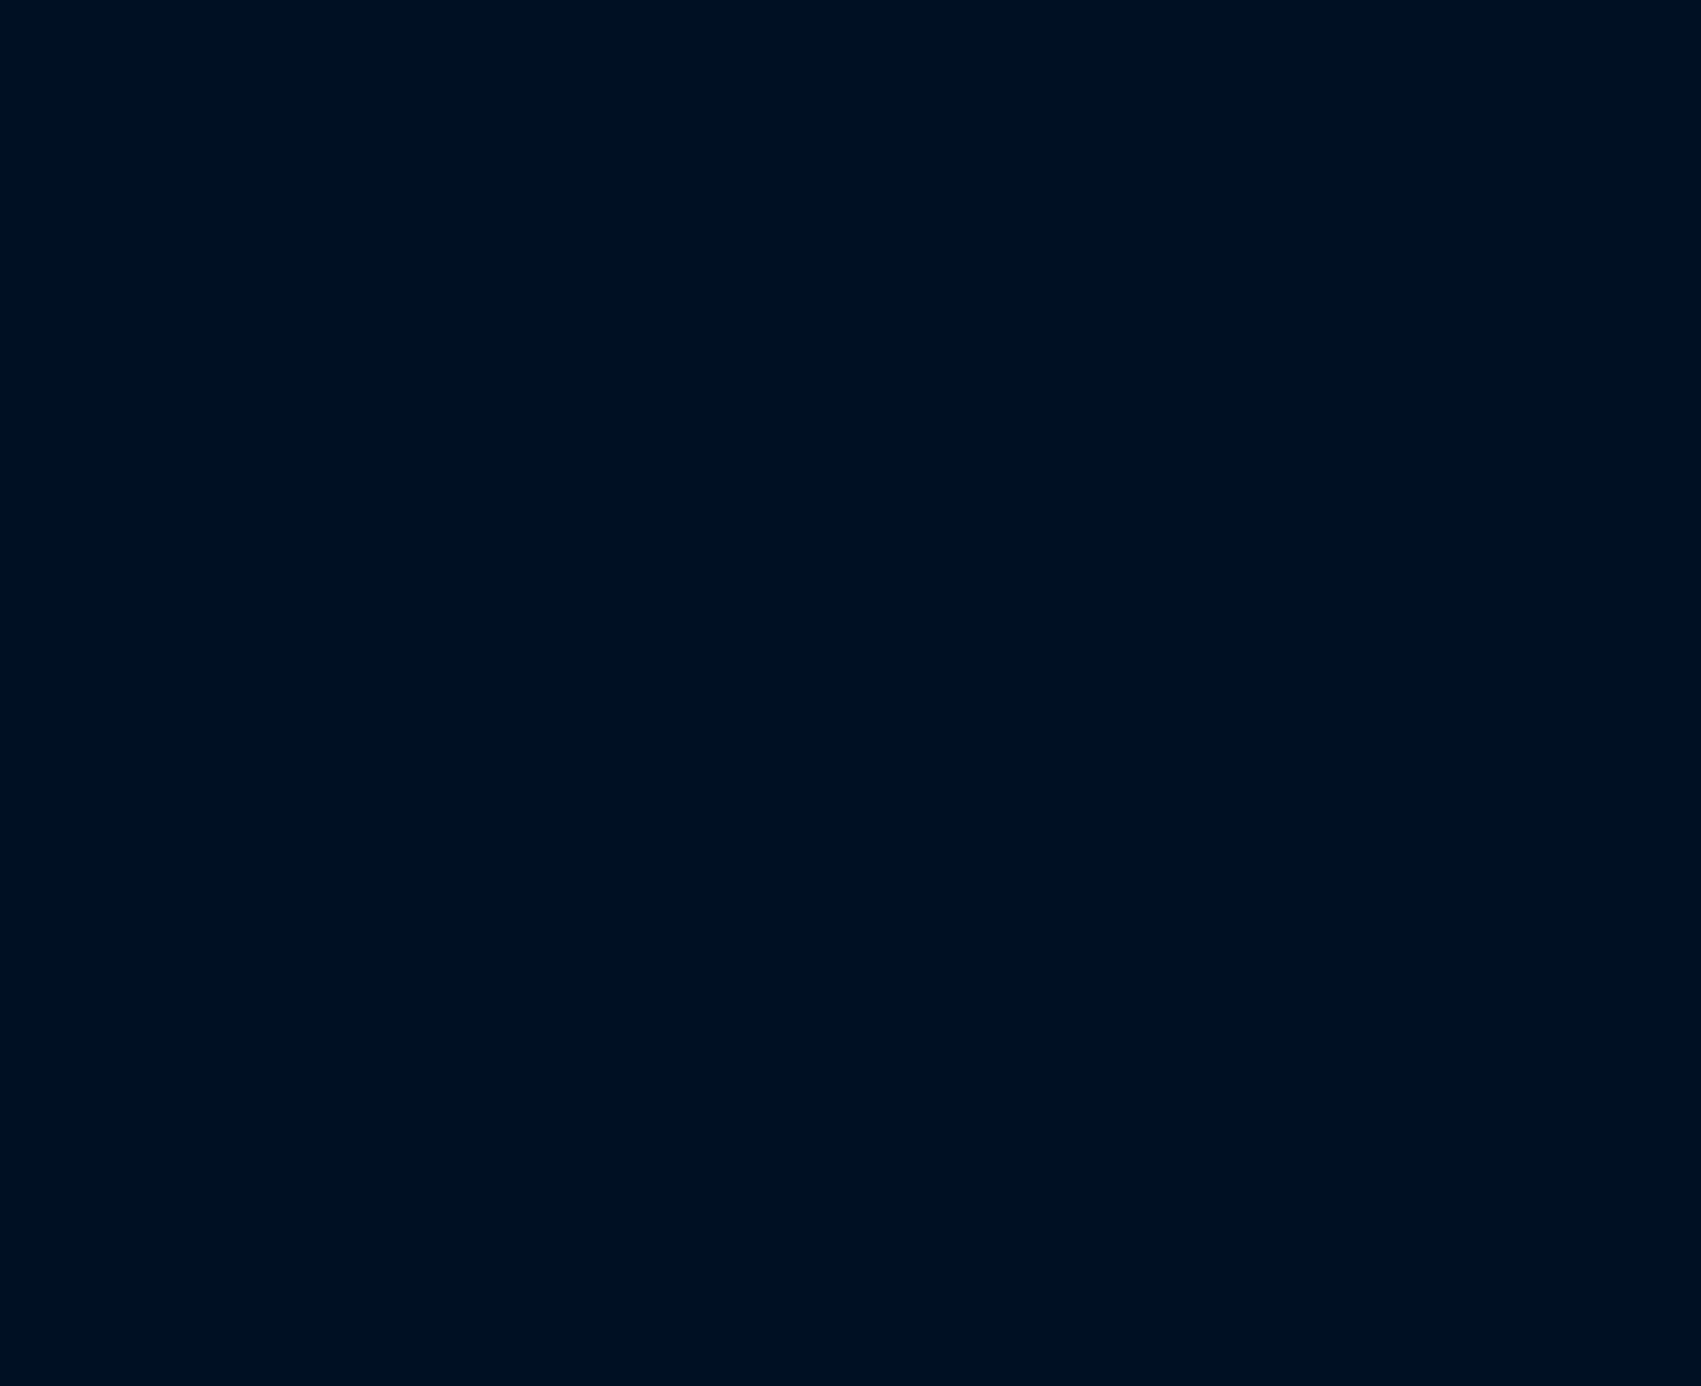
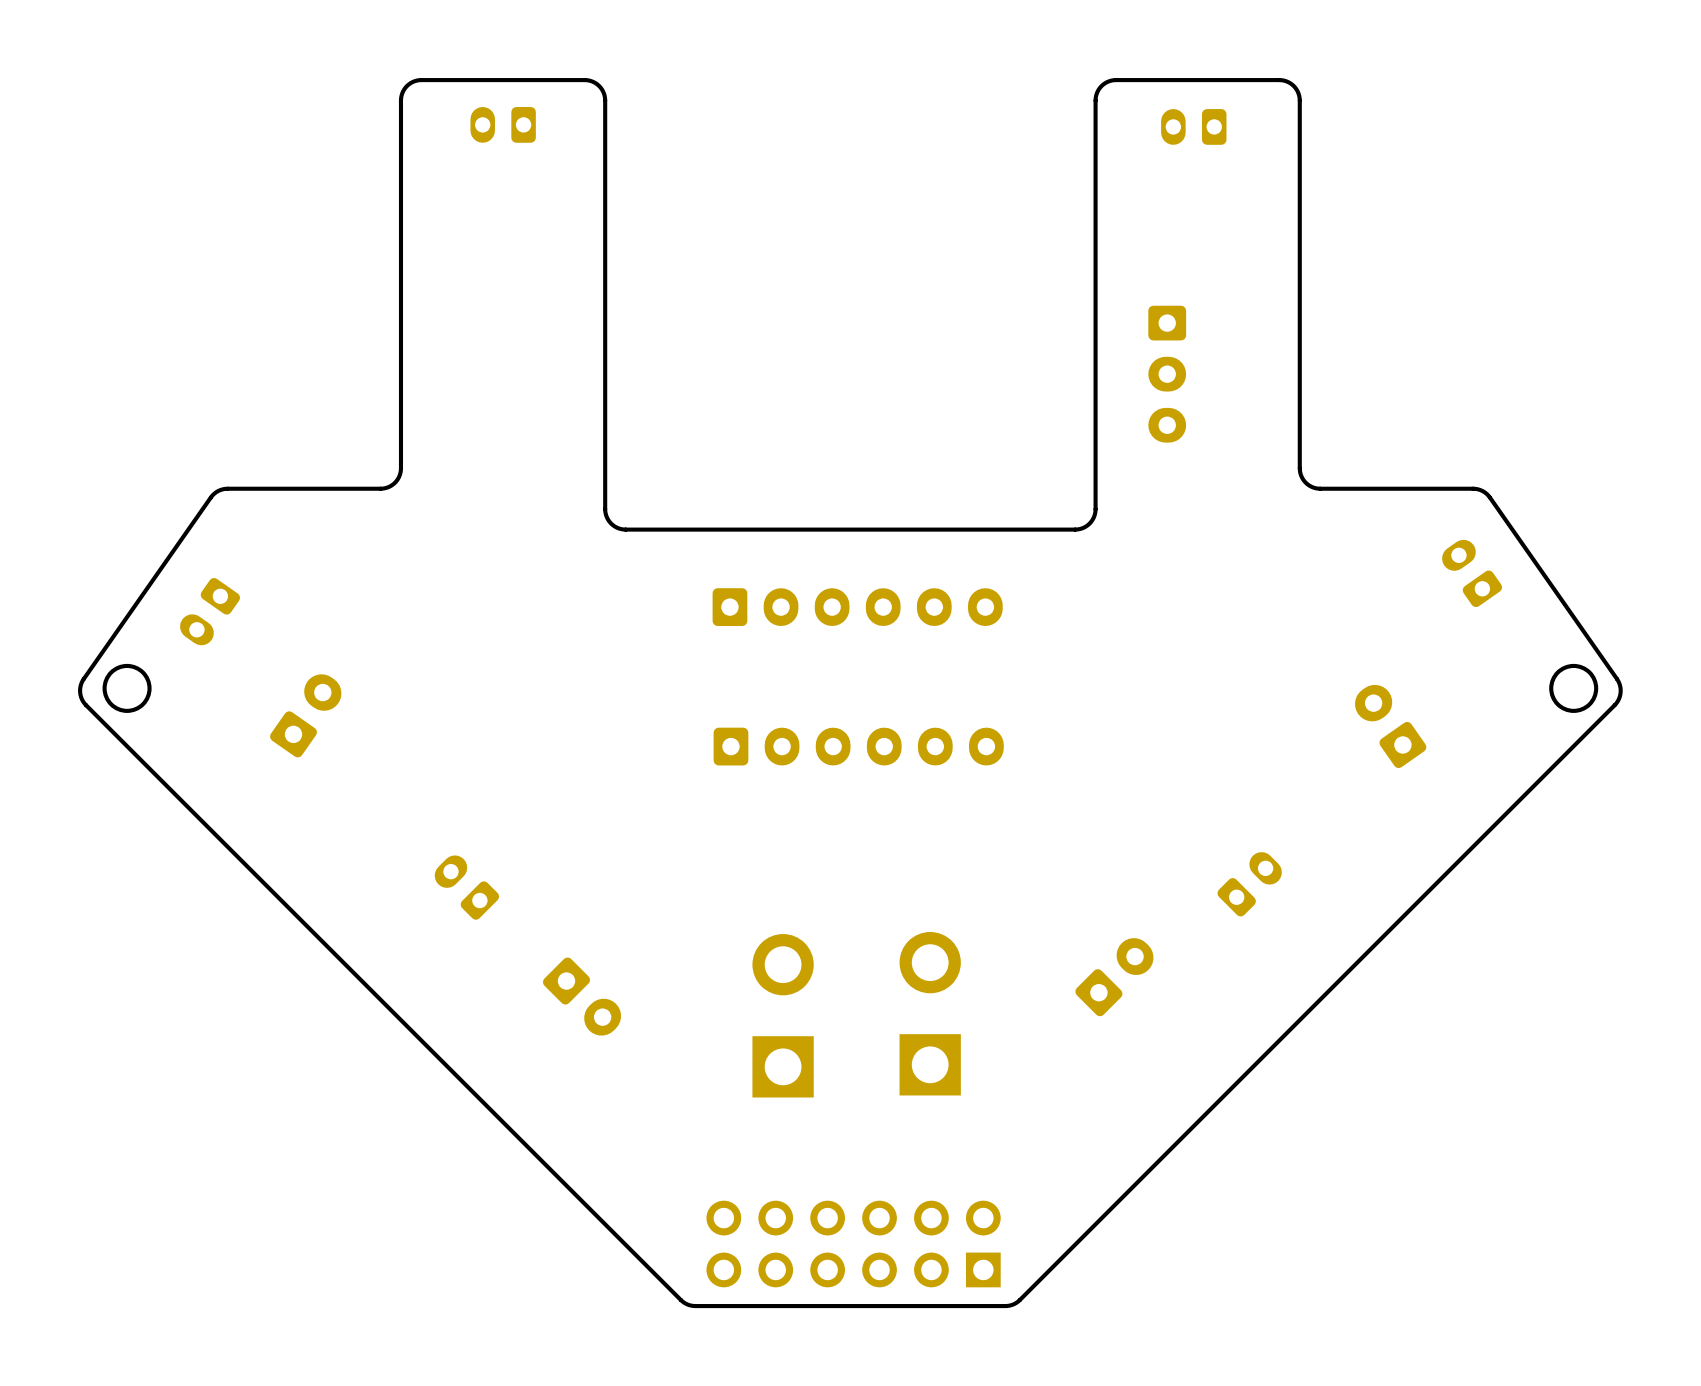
board edge: none -> (1279, 80) (1113, 80) (1105, 83) (1097, 91) (1095, 100) (1095, 509) (1094, 515) (1089, 523) (1084, 527) (1075, 529) (625, 529) (614, 526) (608, 520) (605, 509) (605, 100) (603, 91) (595, 83) (584, 80) (421, 80) (412, 82) (404, 89) (400, 100) (400, 468) (398, 477) (393, 484) (382, 488) (227, 488) (216, 492) (82, 681) (80, 692) (86, 705) (685, 1303) (695, 1306) (1005, 1306) (1016, 1302) (1618, 699) (1620, 687) (1617, 679) (1484, 492) (1473, 488) (1317, 488) (1307, 484) (1301, 477) (1299, 468) (1299, 100) (1298, 92) (1293, 86) (1287, 81) (1279, 80)
part: none -> (503, 124)
part: none -> (1193, 126)
part: none -> (1167, 374)
part: none -> (1472, 573)
part: none -> (857, 607)
part: none -> (210, 611)
round board edge: none -> [102, 663, 152, 713]
round board edge: none -> [1549, 663, 1599, 713]
part: none -> (305, 715)
part: none -> (1390, 726)
part: none -> (858, 746)
part: none -> (1249, 884)
part: none -> (466, 887)
part: none -> (1114, 977)
part: none -> (582, 996)
part: none -> (930, 1013)
part: none -> (783, 1015)
part: none -> (853, 1244)

